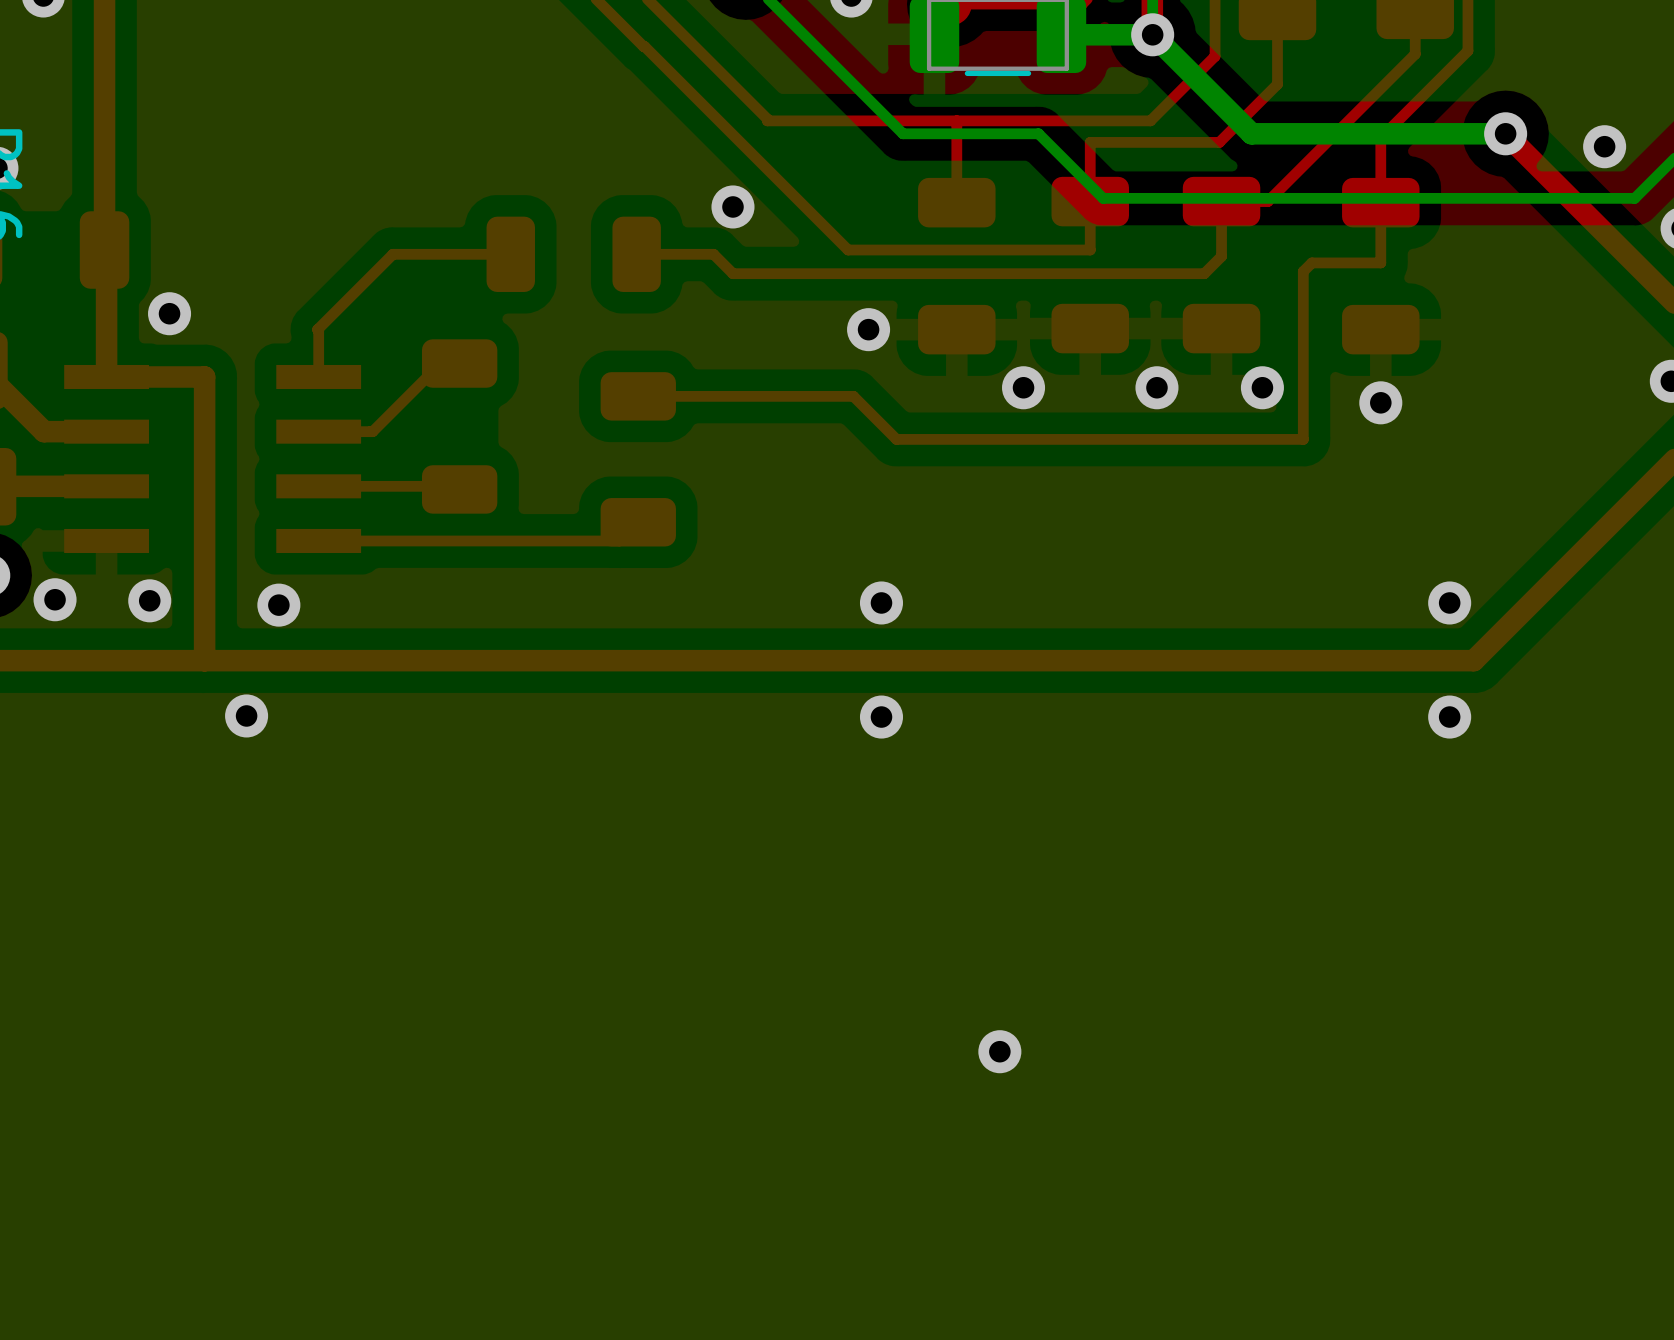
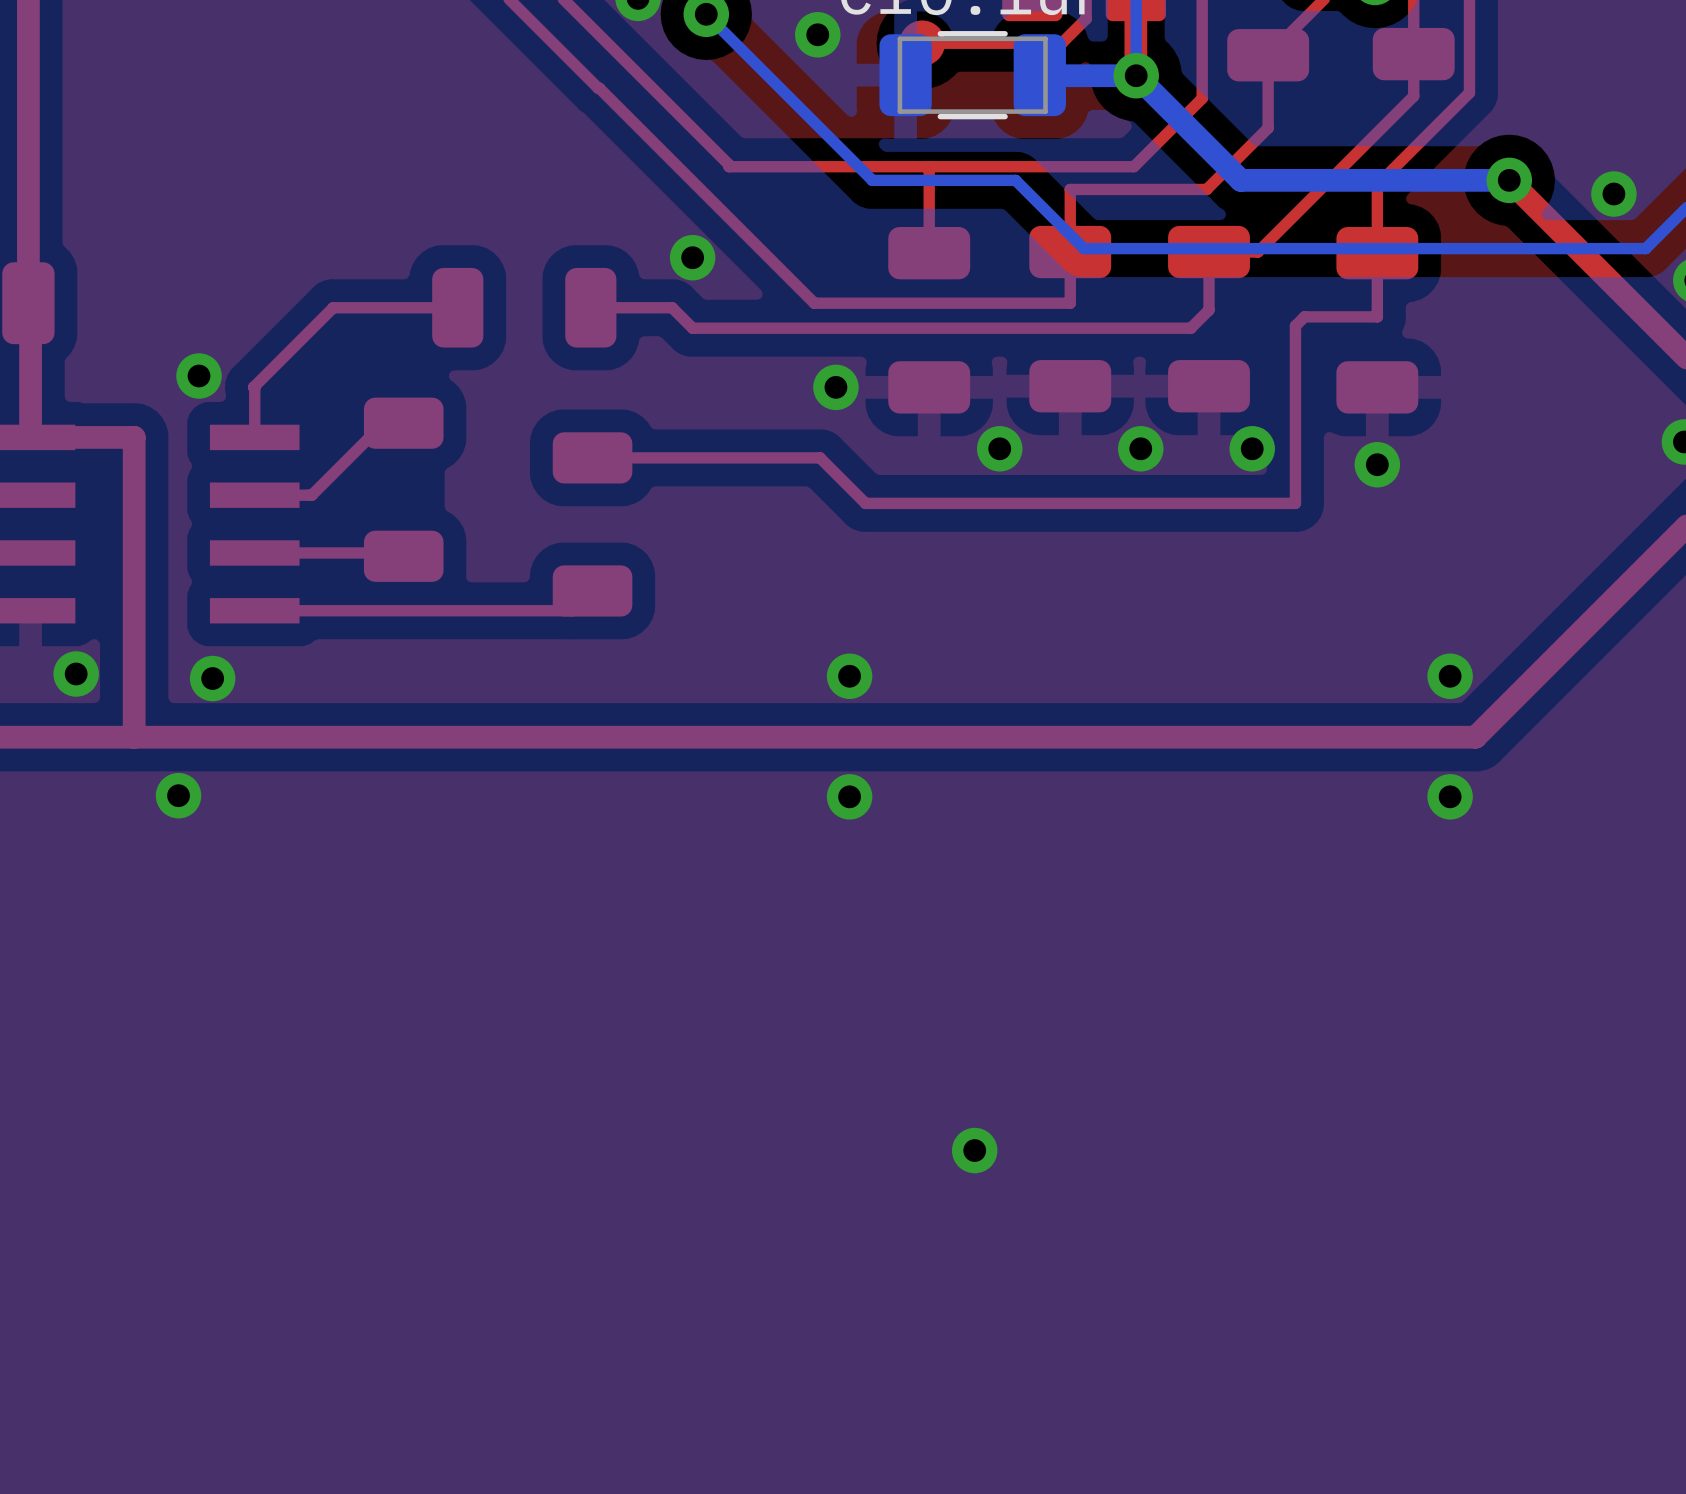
via position: (169, 313) -> (199, 375)

